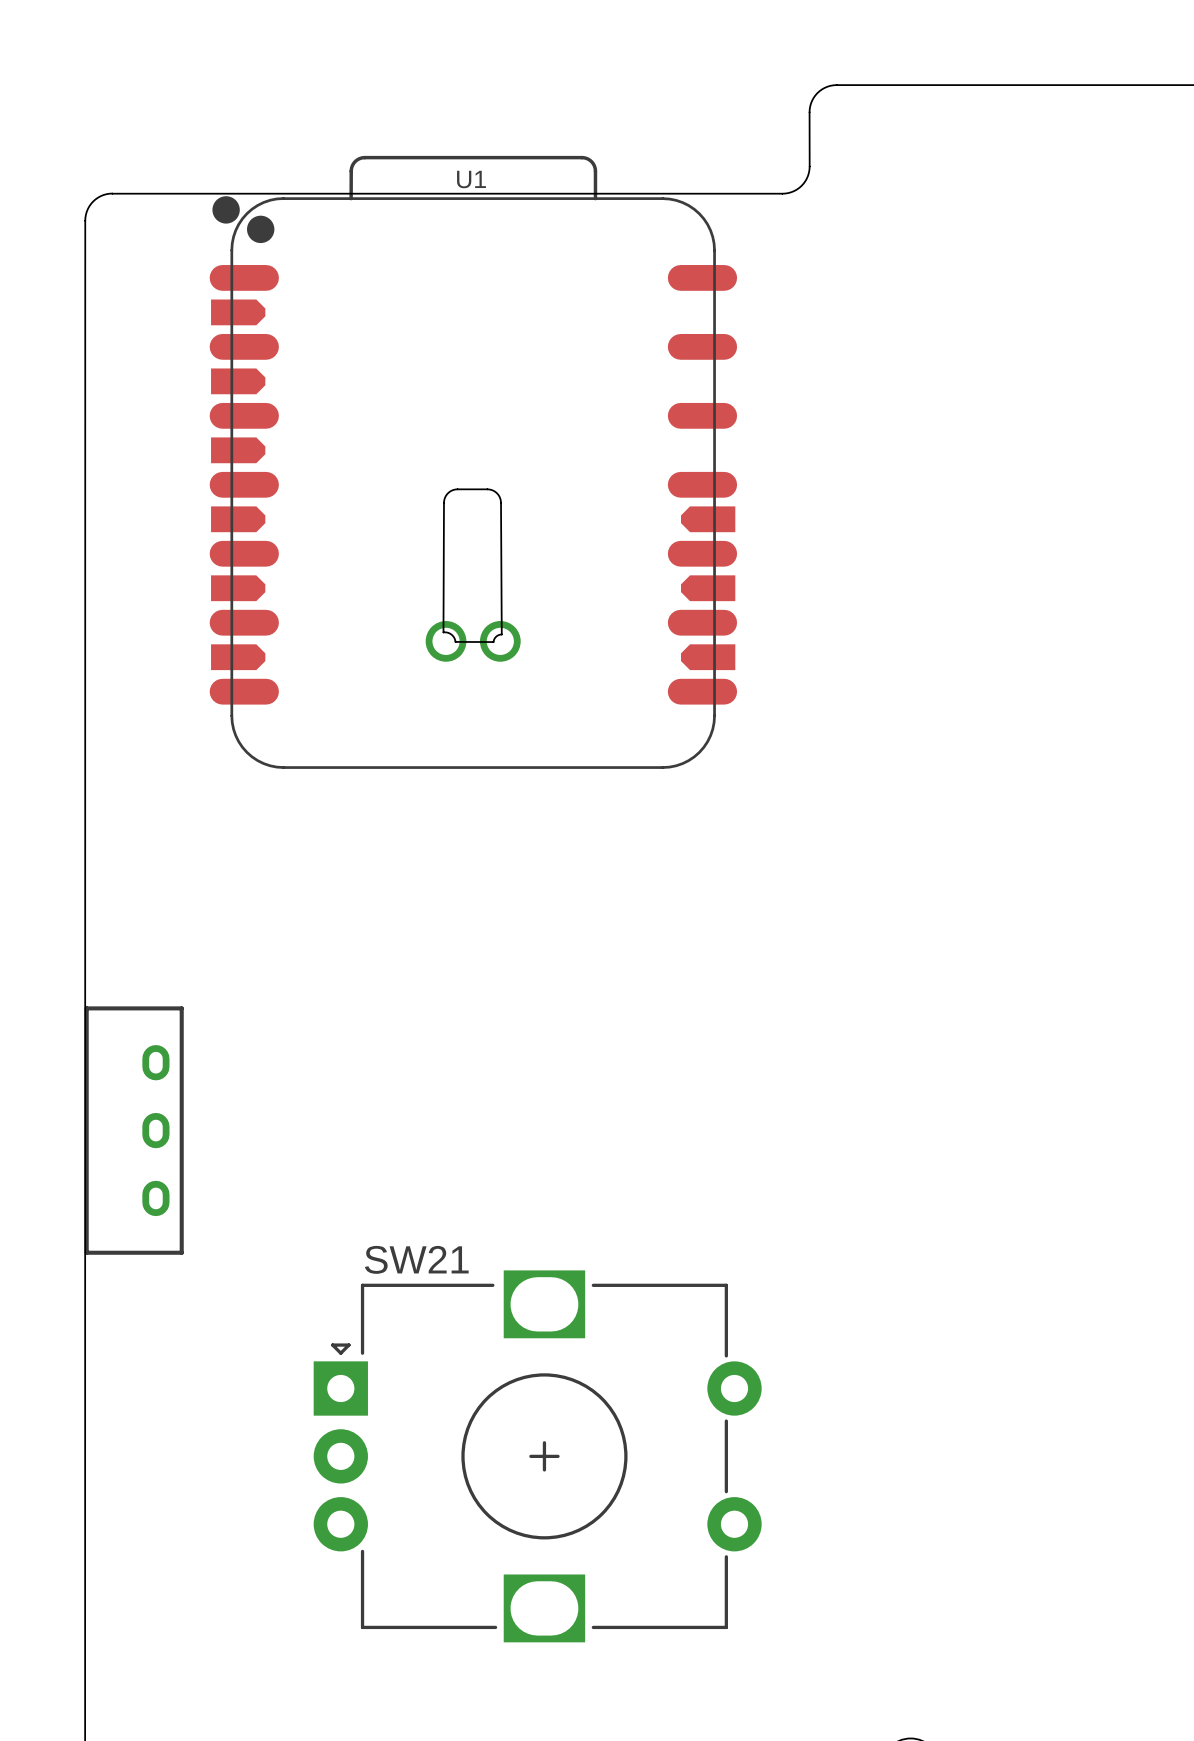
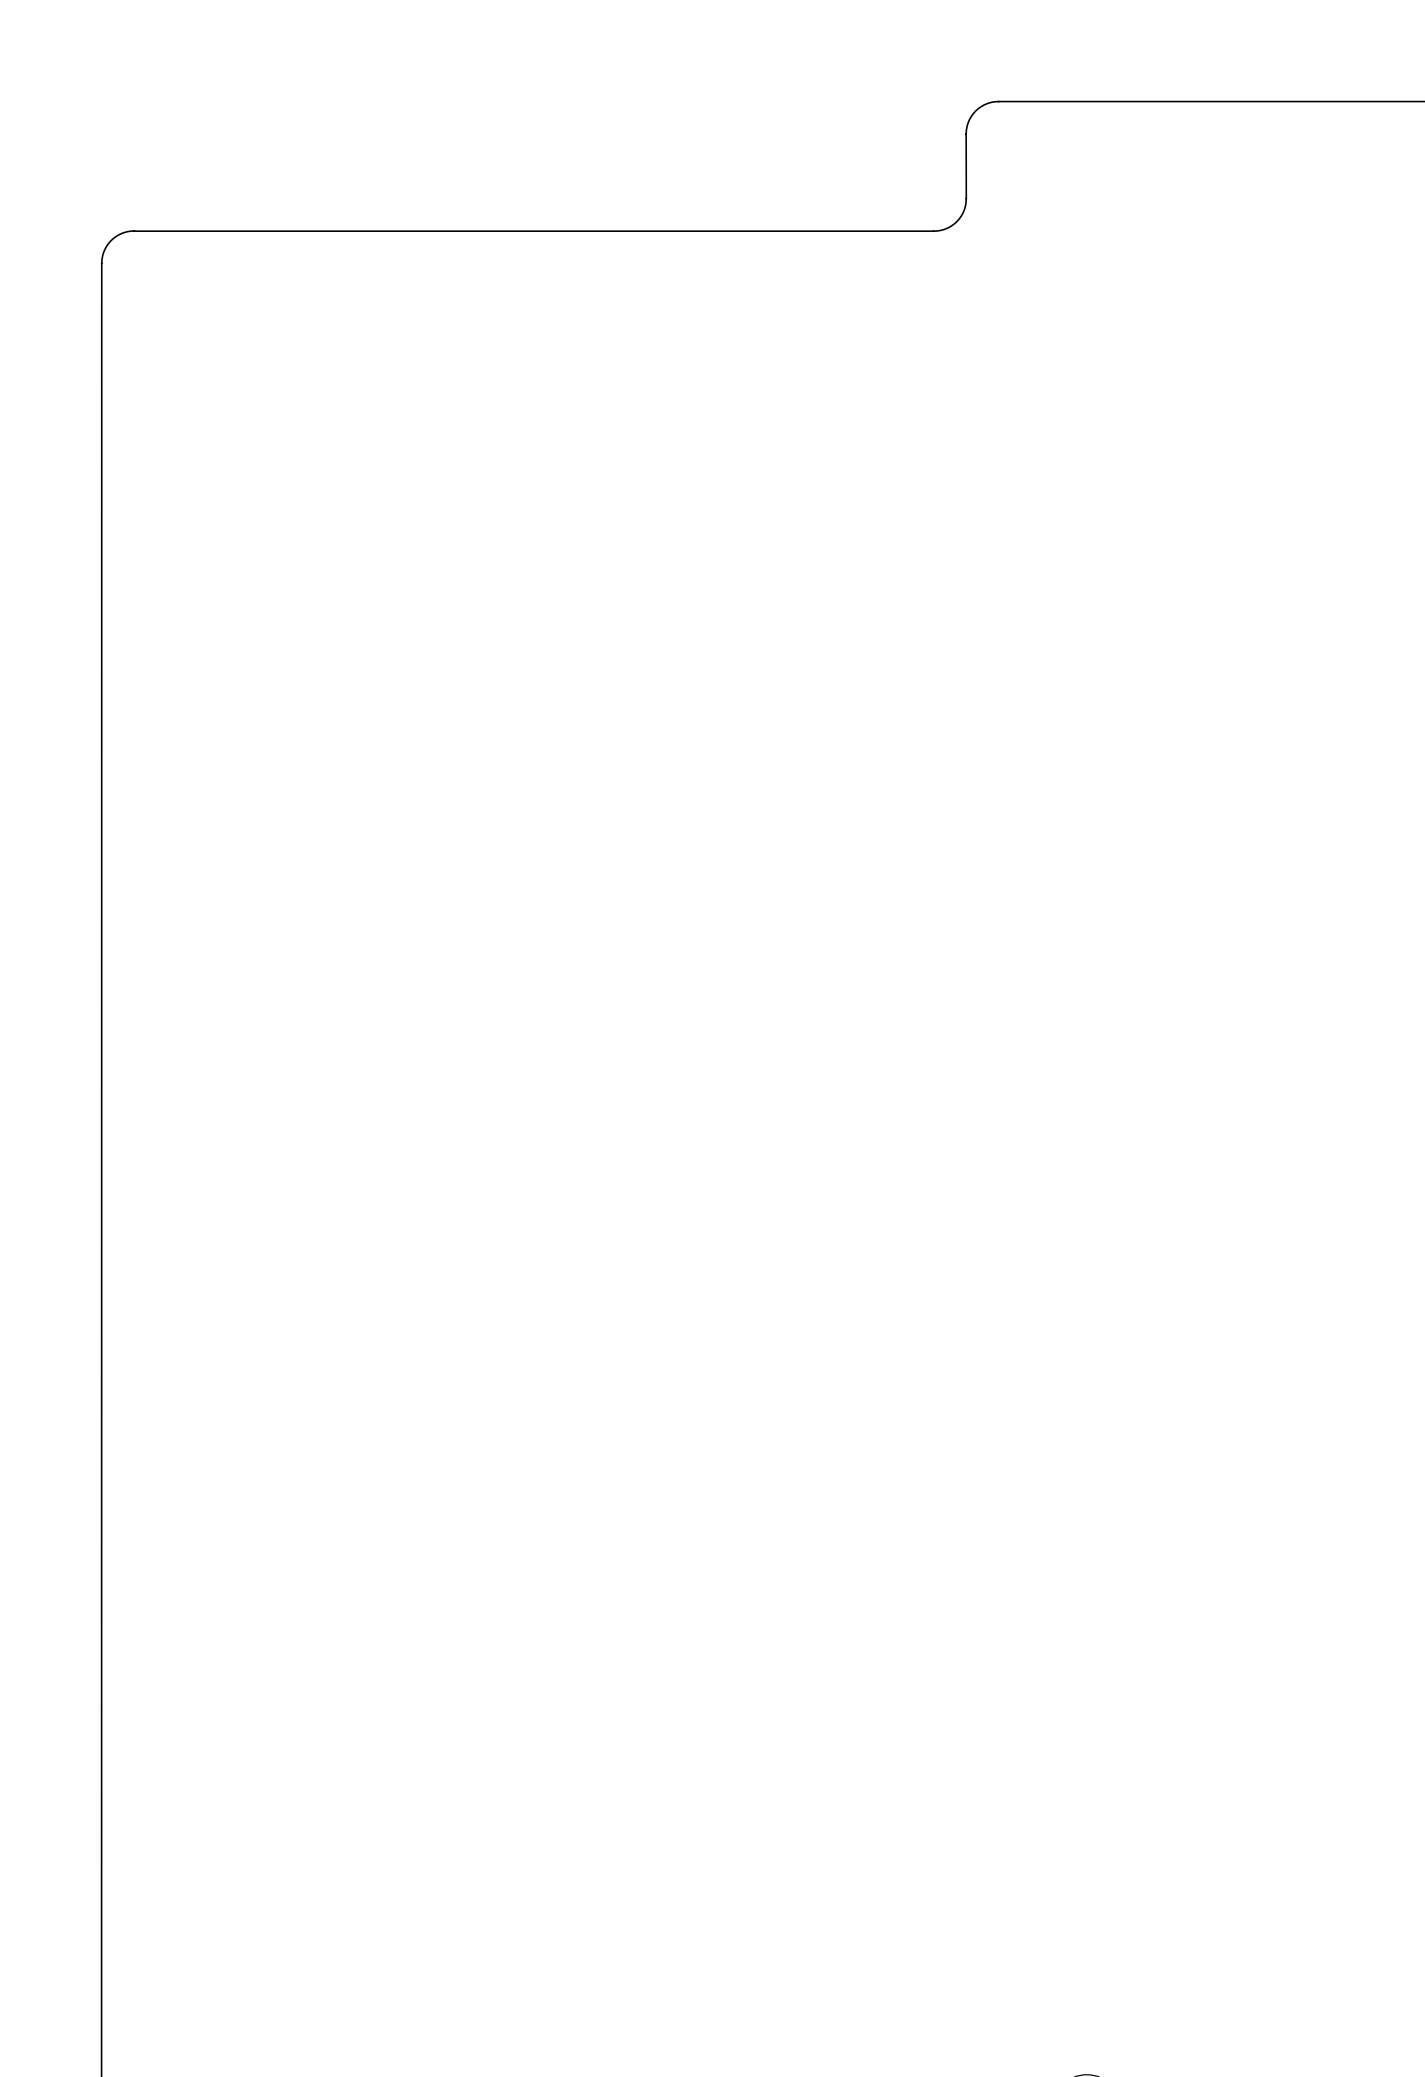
U1: (473, 462) -> none
part: (134, 1130) -> none
SW21: (537, 1456) -> none

